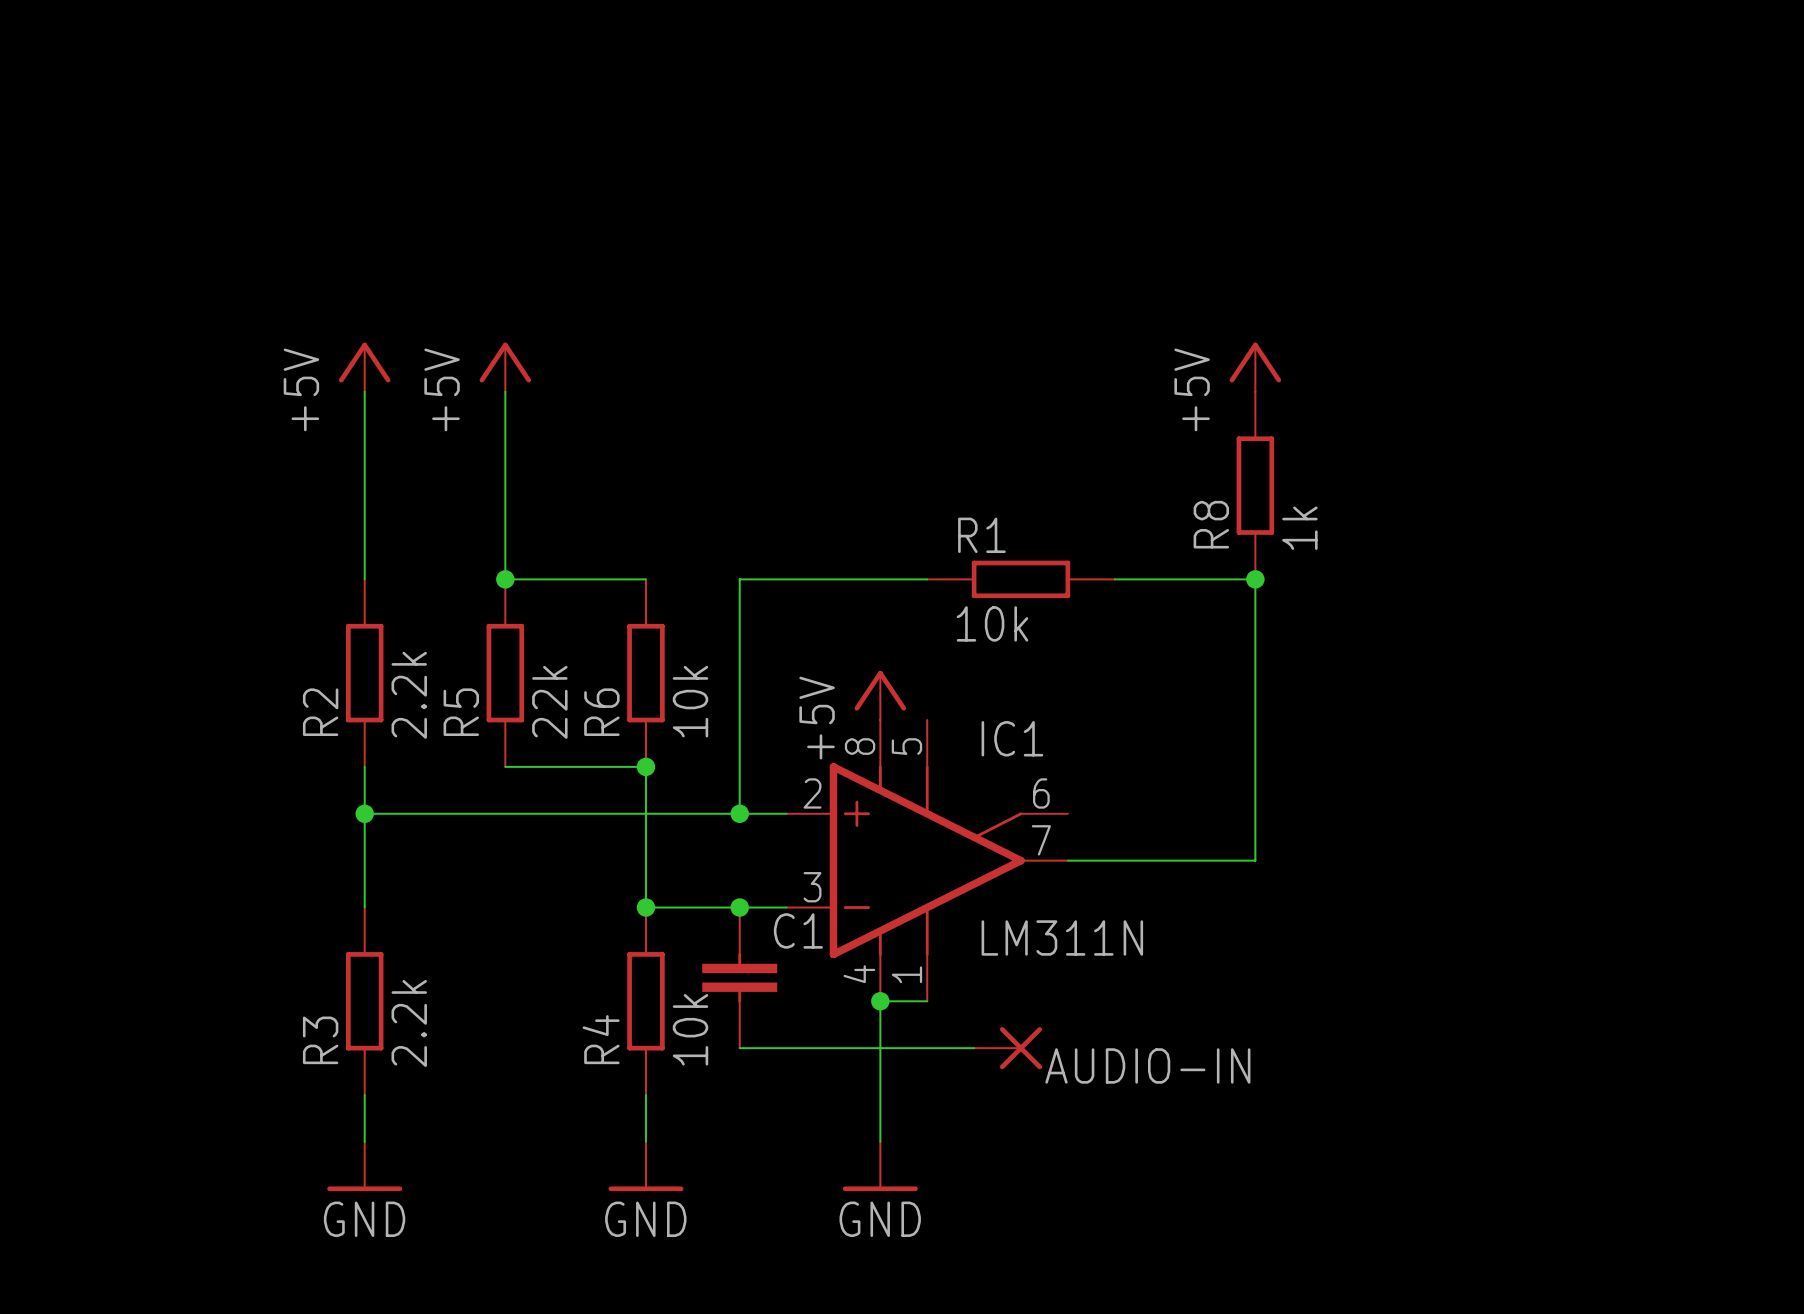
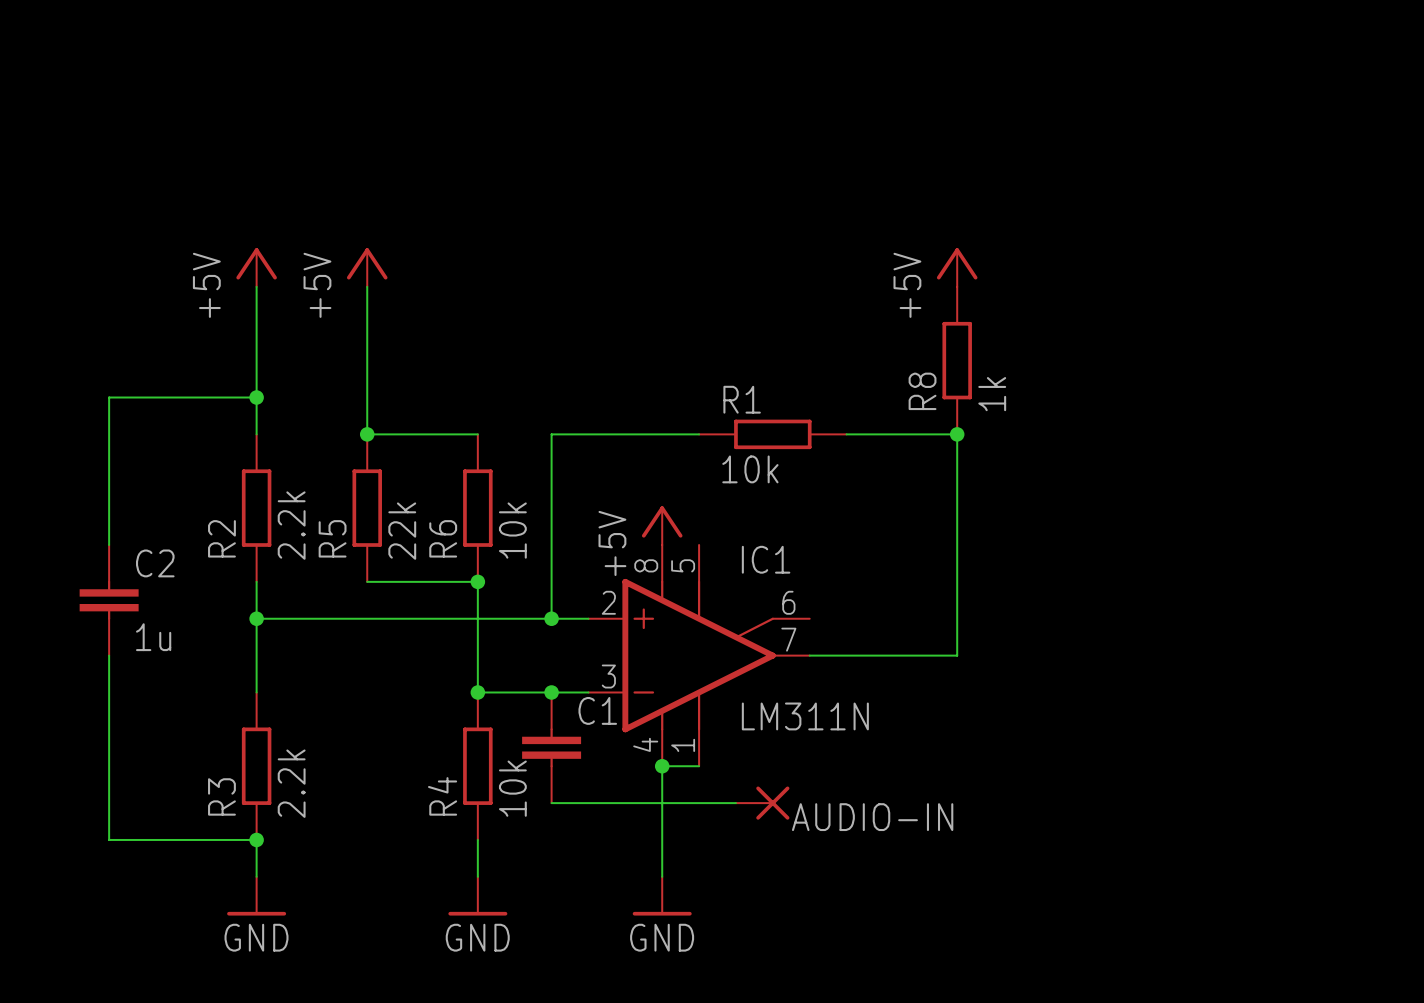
wire: none -> (256, 397) (109, 397) (109, 544)
junction: none -> (256, 397)
C2: none -> 1u (109, 600)
wire: none -> (109, 655) (109, 839) (256, 839)
junction: none -> (256, 839)

